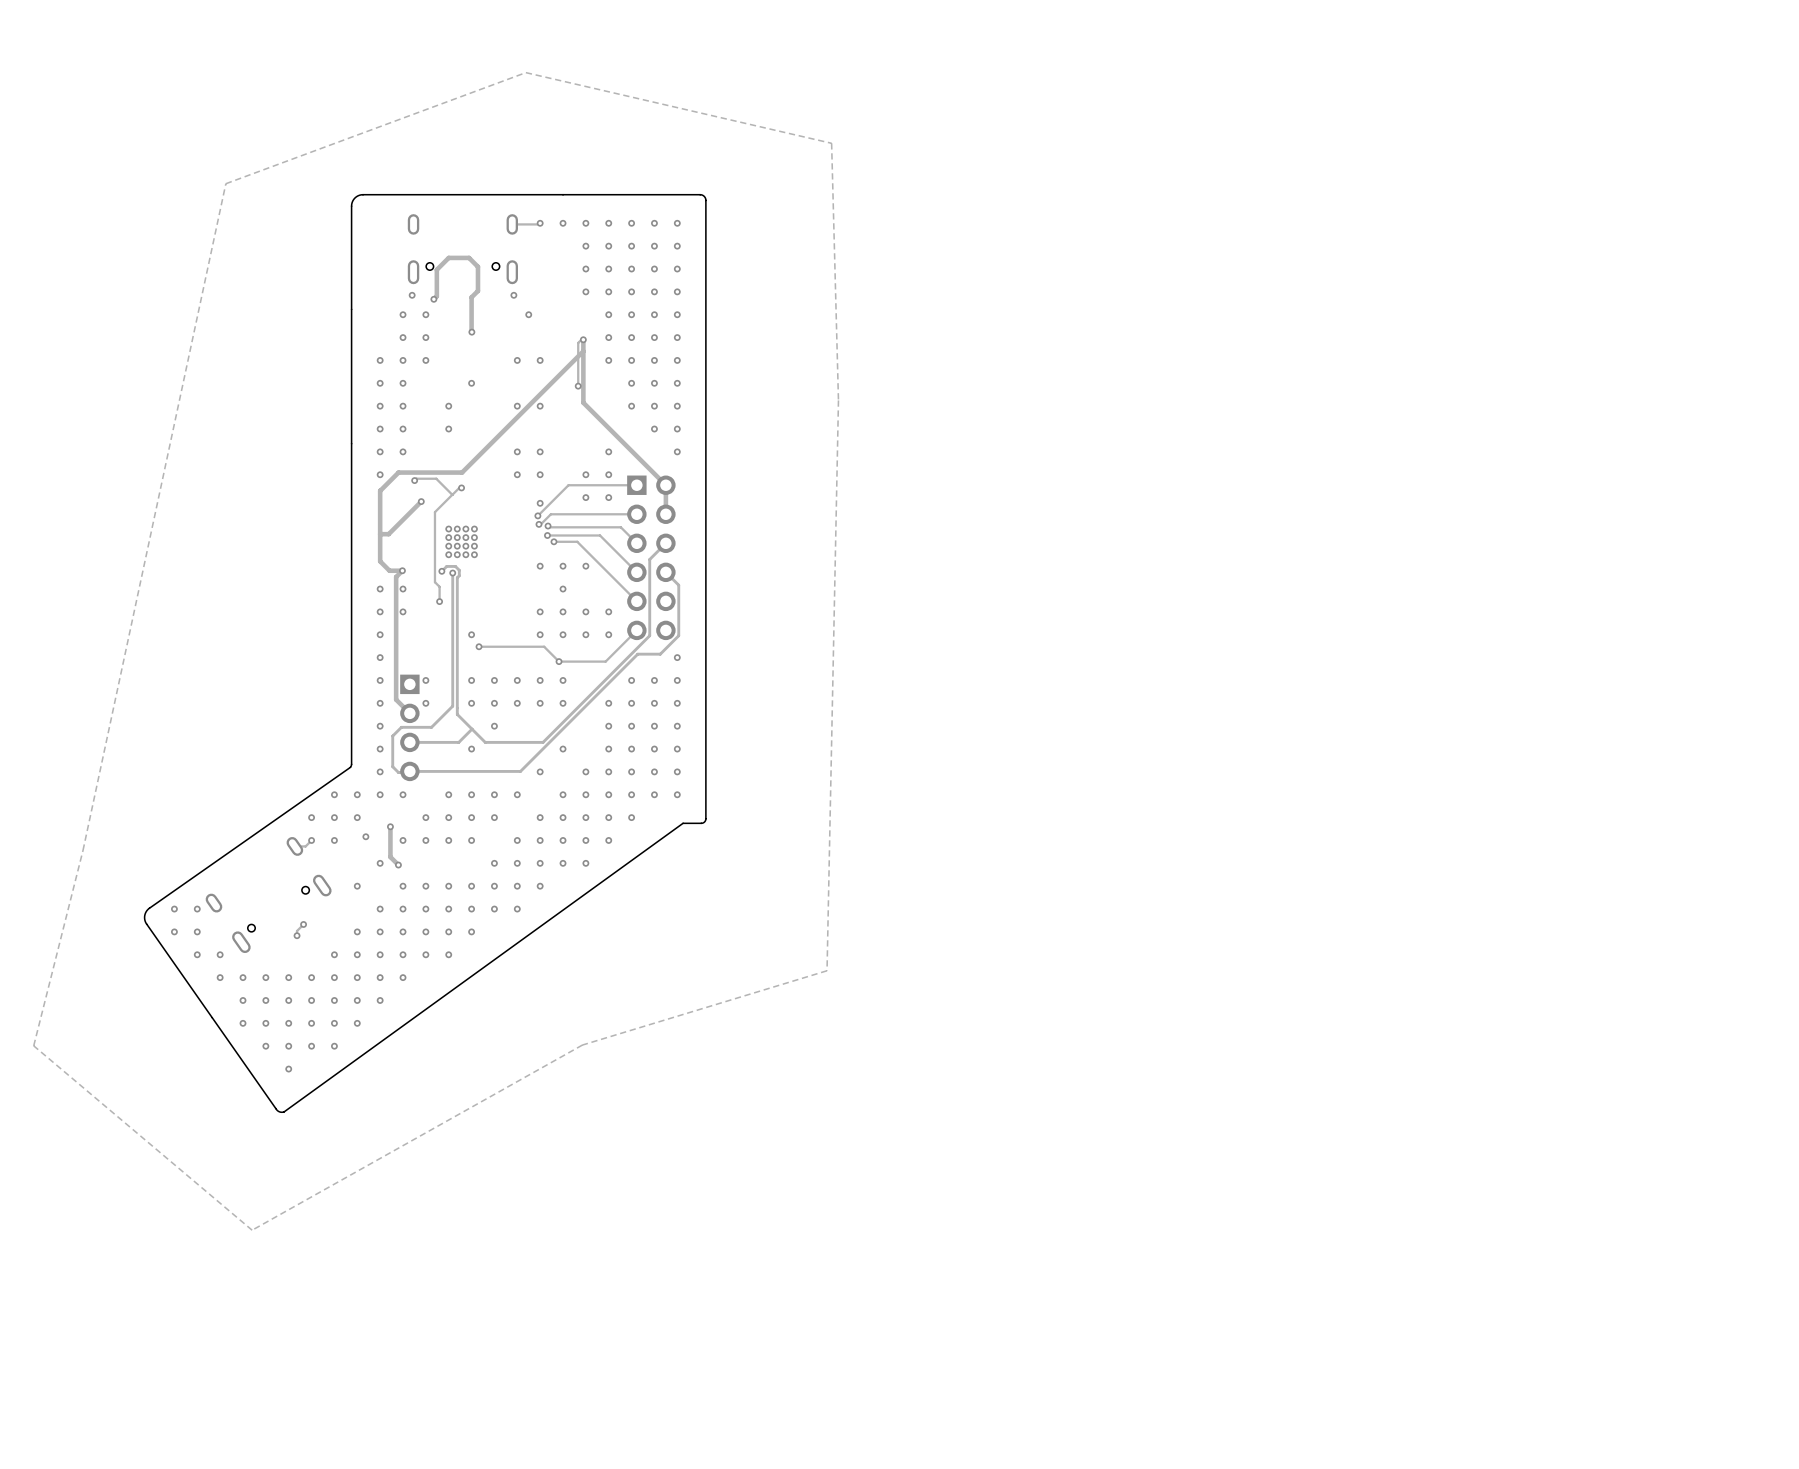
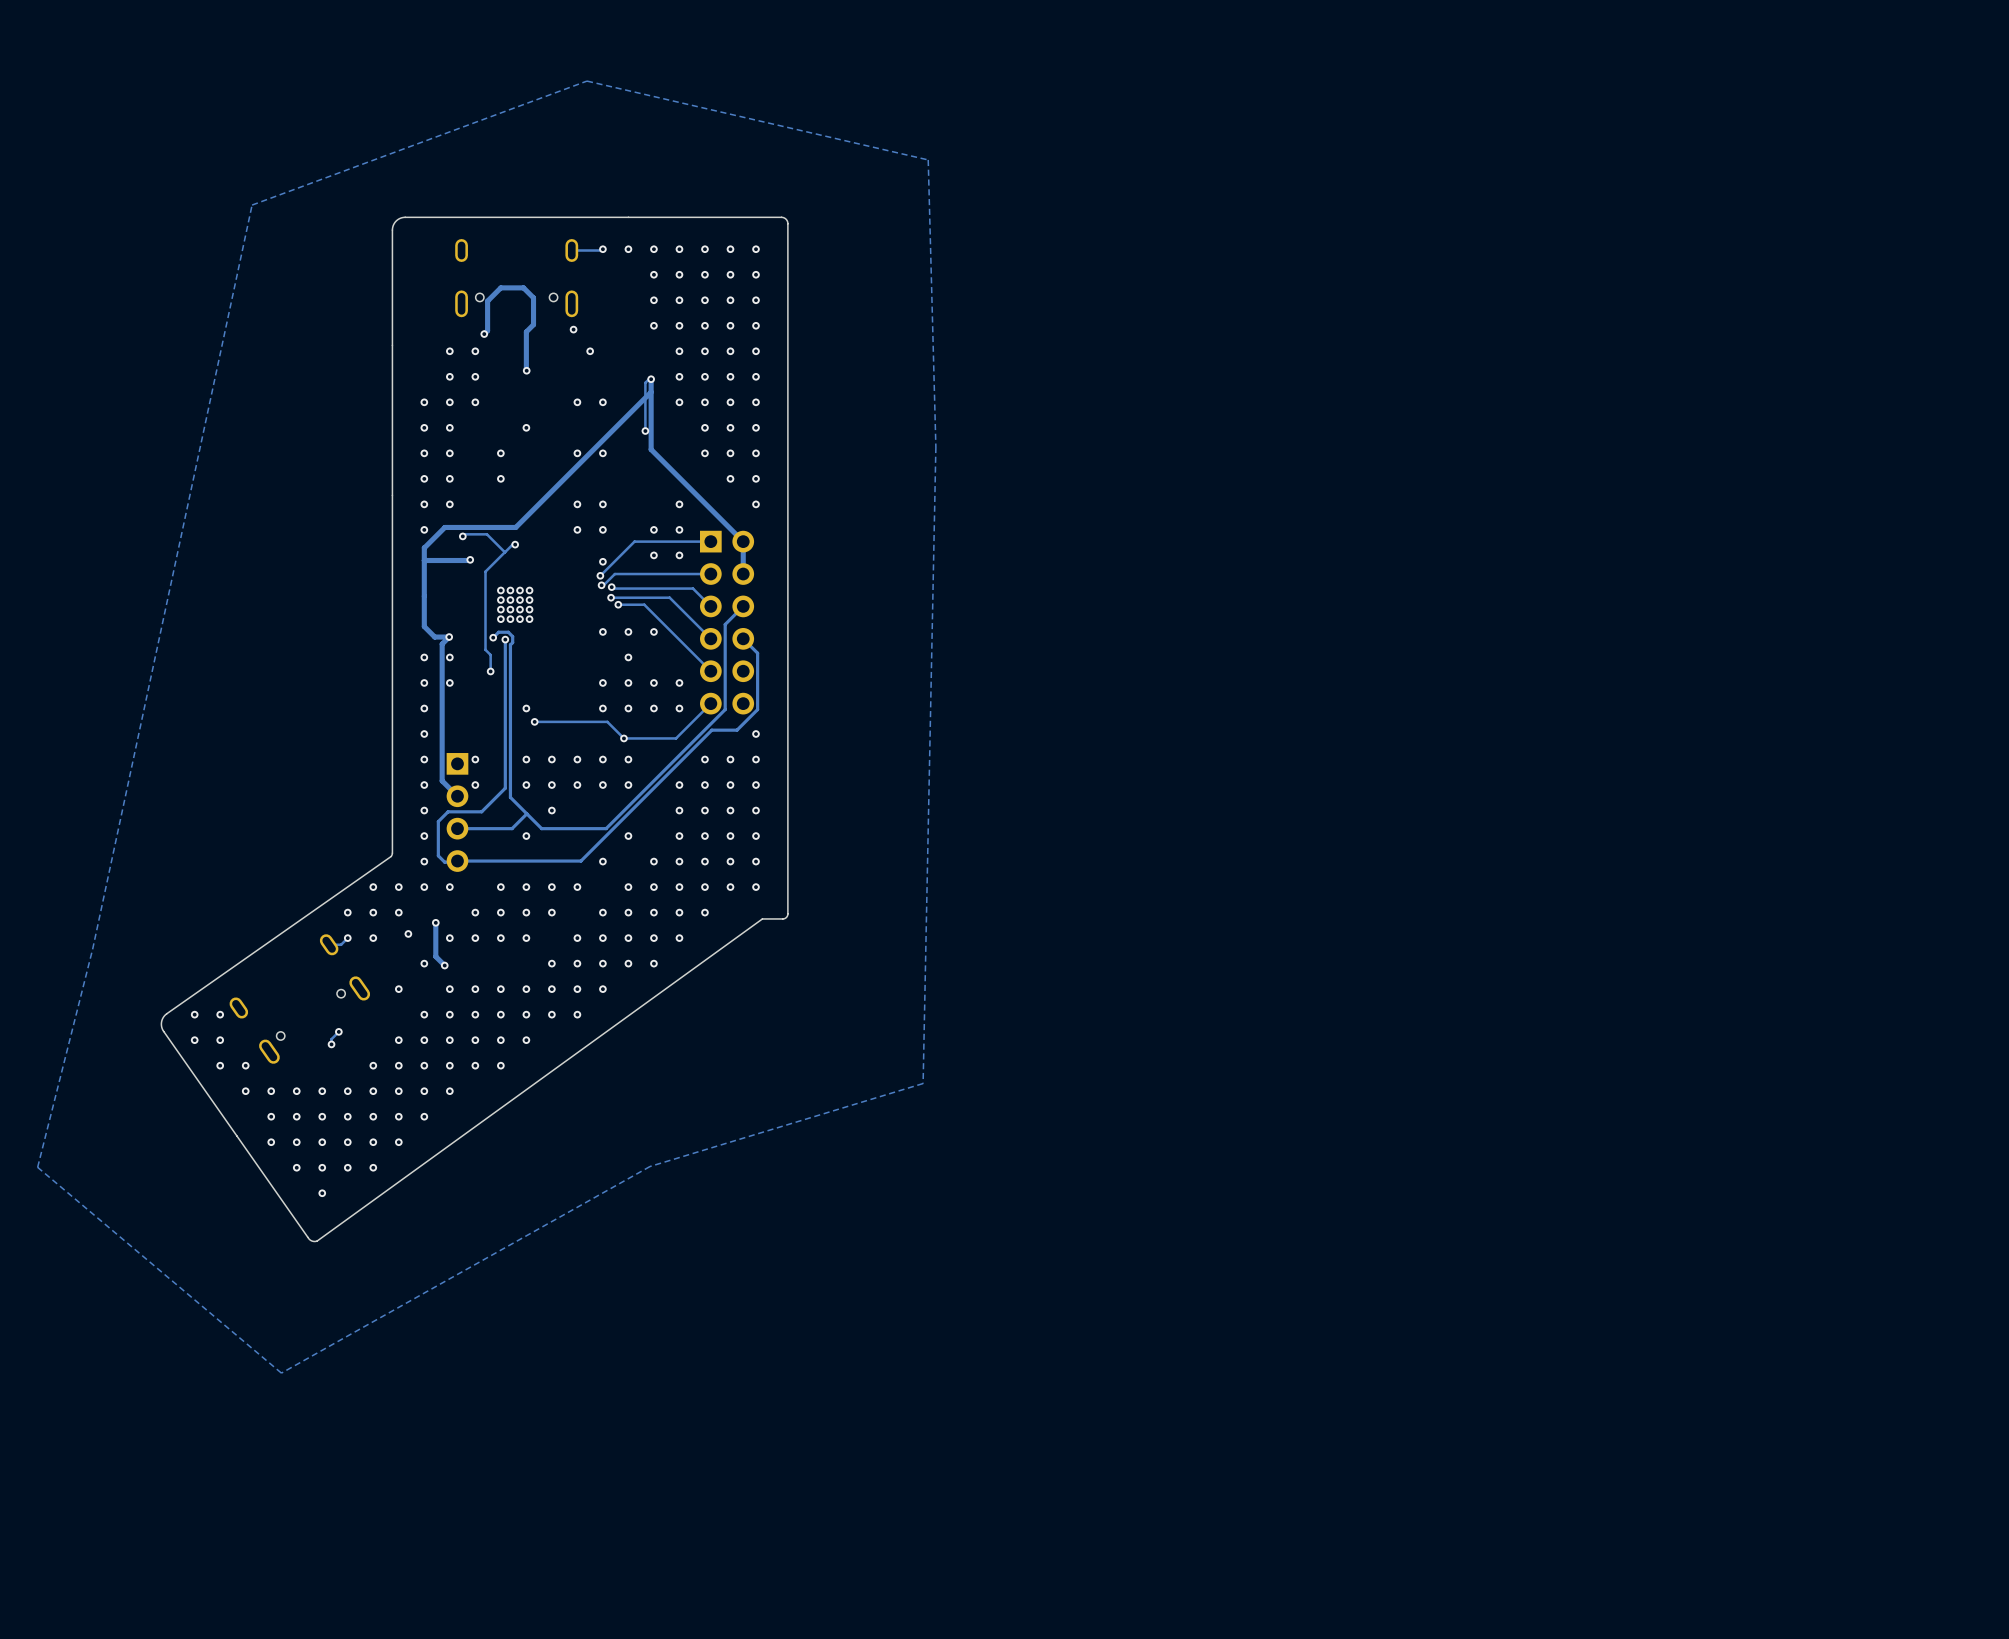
via: (412, 295) -> none
track: (420, 502) (388, 534) (380, 534) -> (469, 560) (424, 560)

